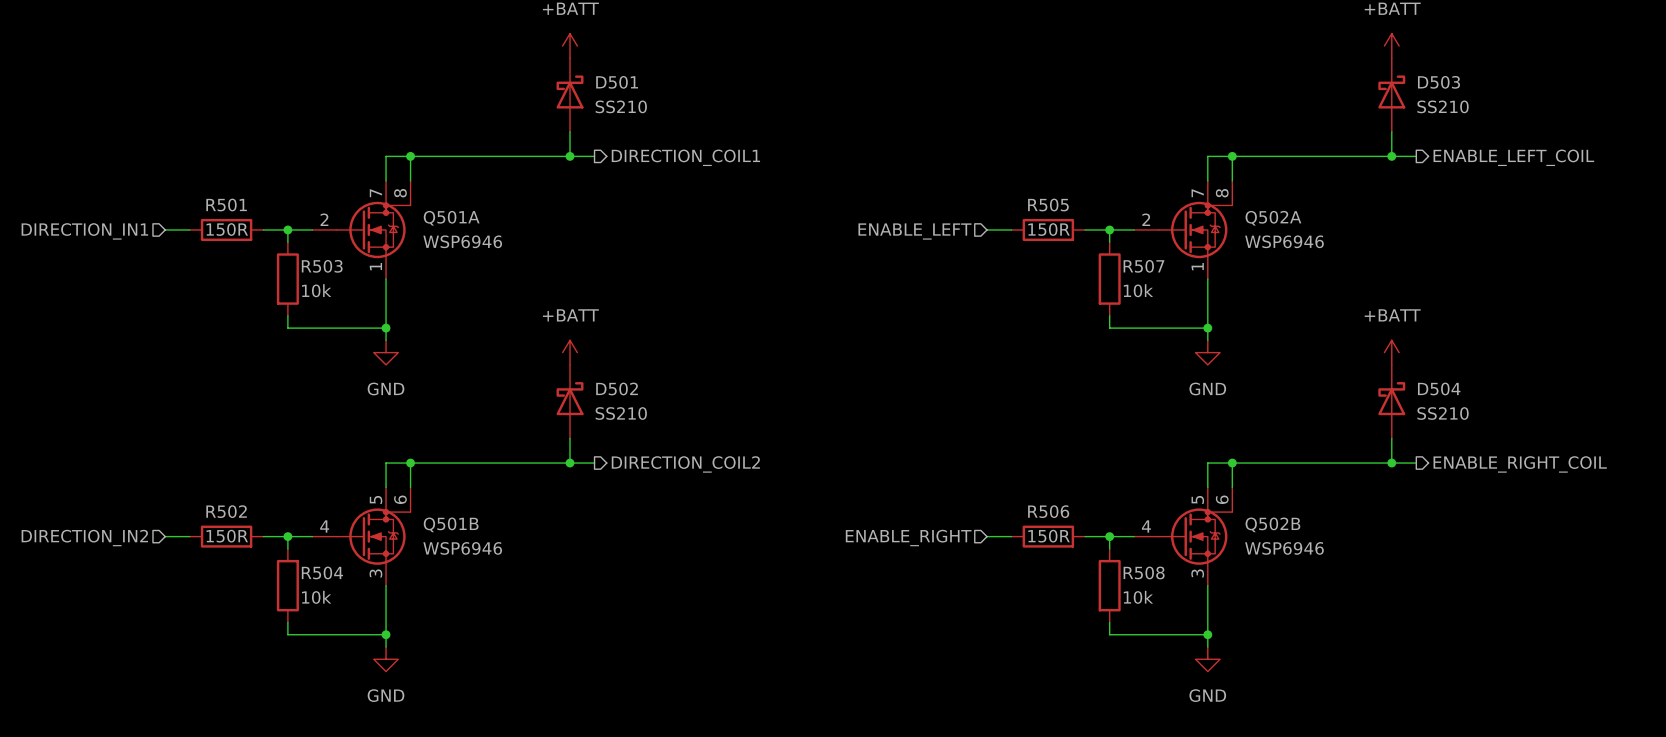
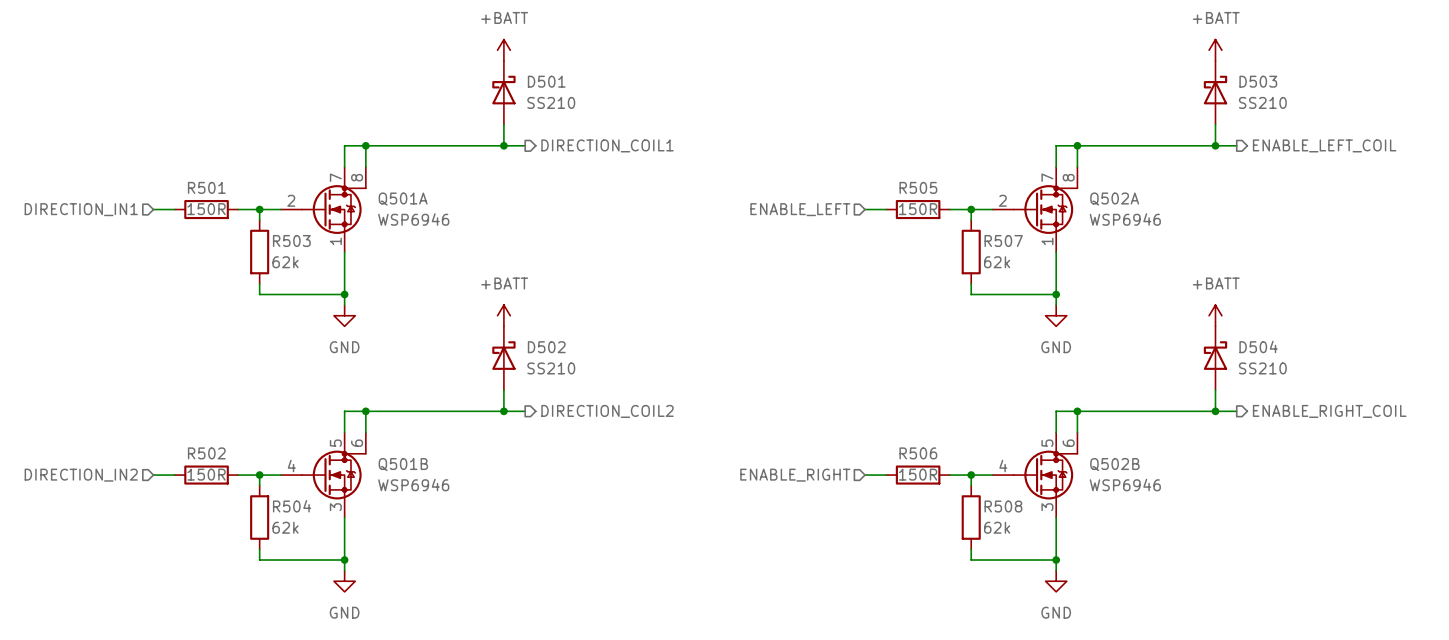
R503 value: 10k (316, 290) -> 62k (285, 262)
R507 value: 10k (1138, 290) -> 62k (997, 262)
R504 value: 10k (316, 597) -> 62k (285, 527)
R508 value: 10k (1138, 597) -> 62k (997, 527)

